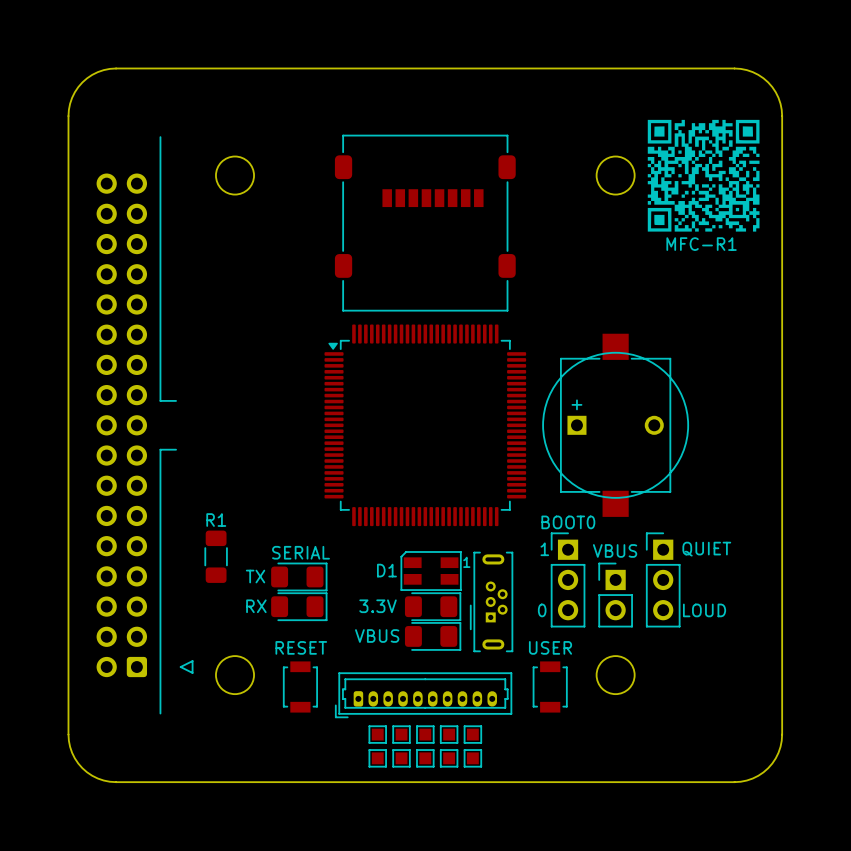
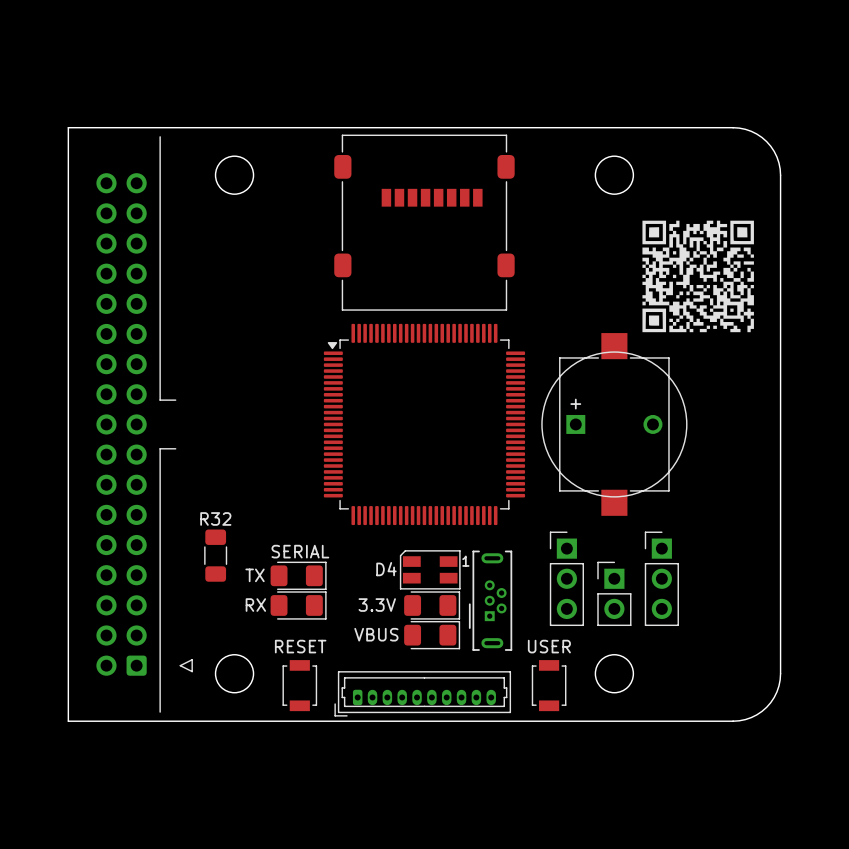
board edge: (68, 127) (70, 103) (78, 87) (92, 74) (109, 68) (740, 68) (752, 72) (763, 78) (772, 87) (778, 97) (782, 116) (782, 175) -> (68, 127) (739, 128) (756, 134) (770, 146) (778, 162) (780, 175)
drawing position: (703, 175) -> (698, 276)
text: MFC-R1 (701, 244) -> none
R1 name: R1 (216, 520) -> R32 (215, 518)
text: BOOT0 (568, 522) -> none
text: 1 (544, 549) -> none
text: QUIET (706, 549) -> none
text: VBUS (615, 550) -> none
D1 name: D1 (386, 570) -> D4 (386, 569)
text: 0 (542, 610) -> none
text: LOUD (704, 610) -> none
board edge: (782, 675) (782, 734) (778, 752) (772, 763) (763, 772) (752, 778) (740, 781) (109, 781) (92, 775) (78, 763) (70, 746) (68, 722) -> (780, 673) (776, 691) (766, 707) (751, 717) (739, 720) (68, 721)
part: (377, 734) -> none
part: (401, 734) -> none
part: (425, 734) -> none
part: (449, 734) -> none
part: (472, 734) -> none
part: (377, 758) -> none
part: (401, 758) -> none
part: (425, 758) -> none
part: (449, 758) -> none
part: (472, 758) -> none

